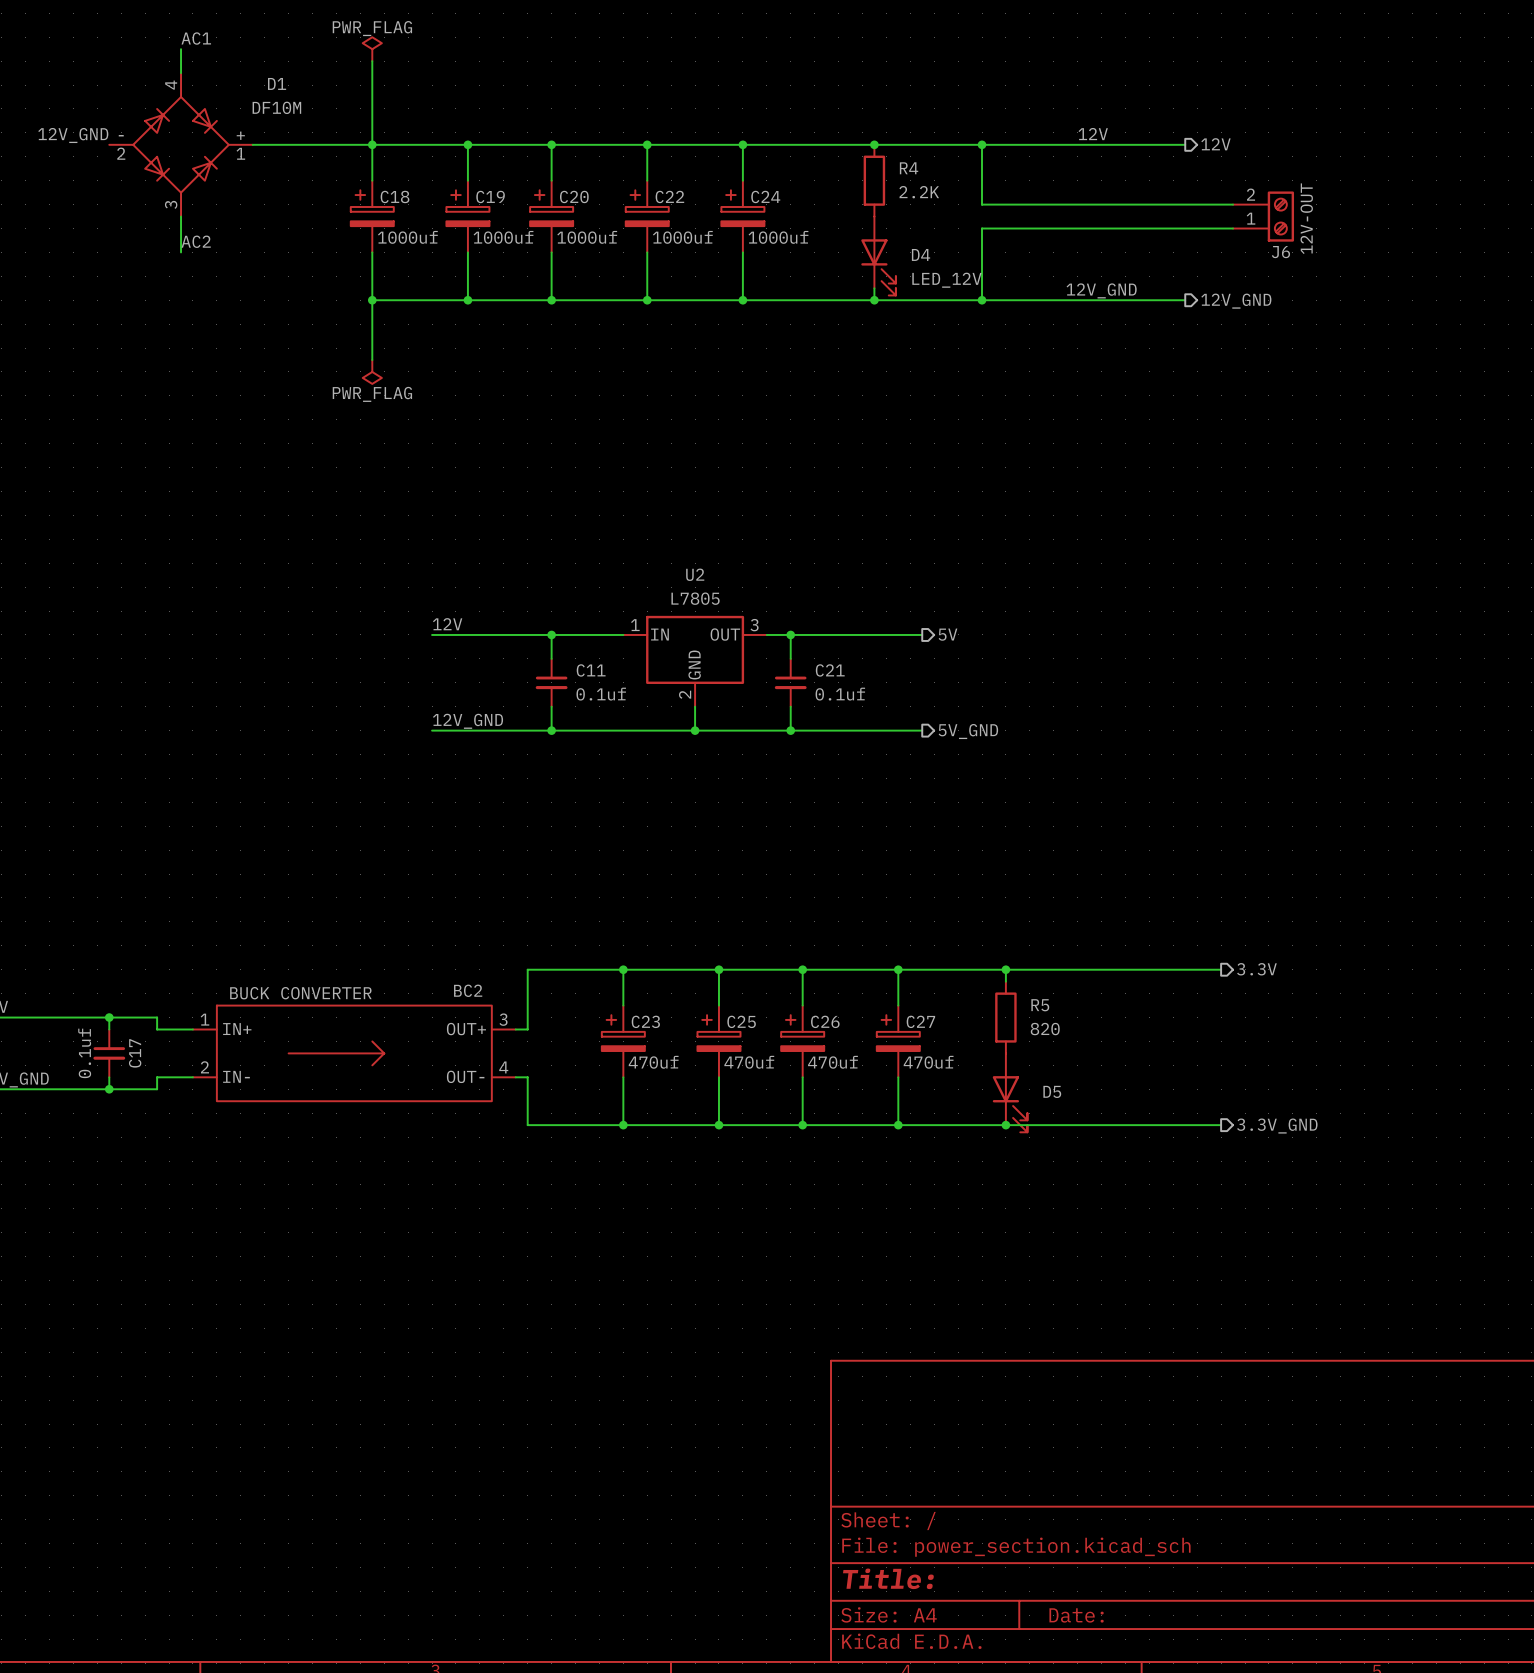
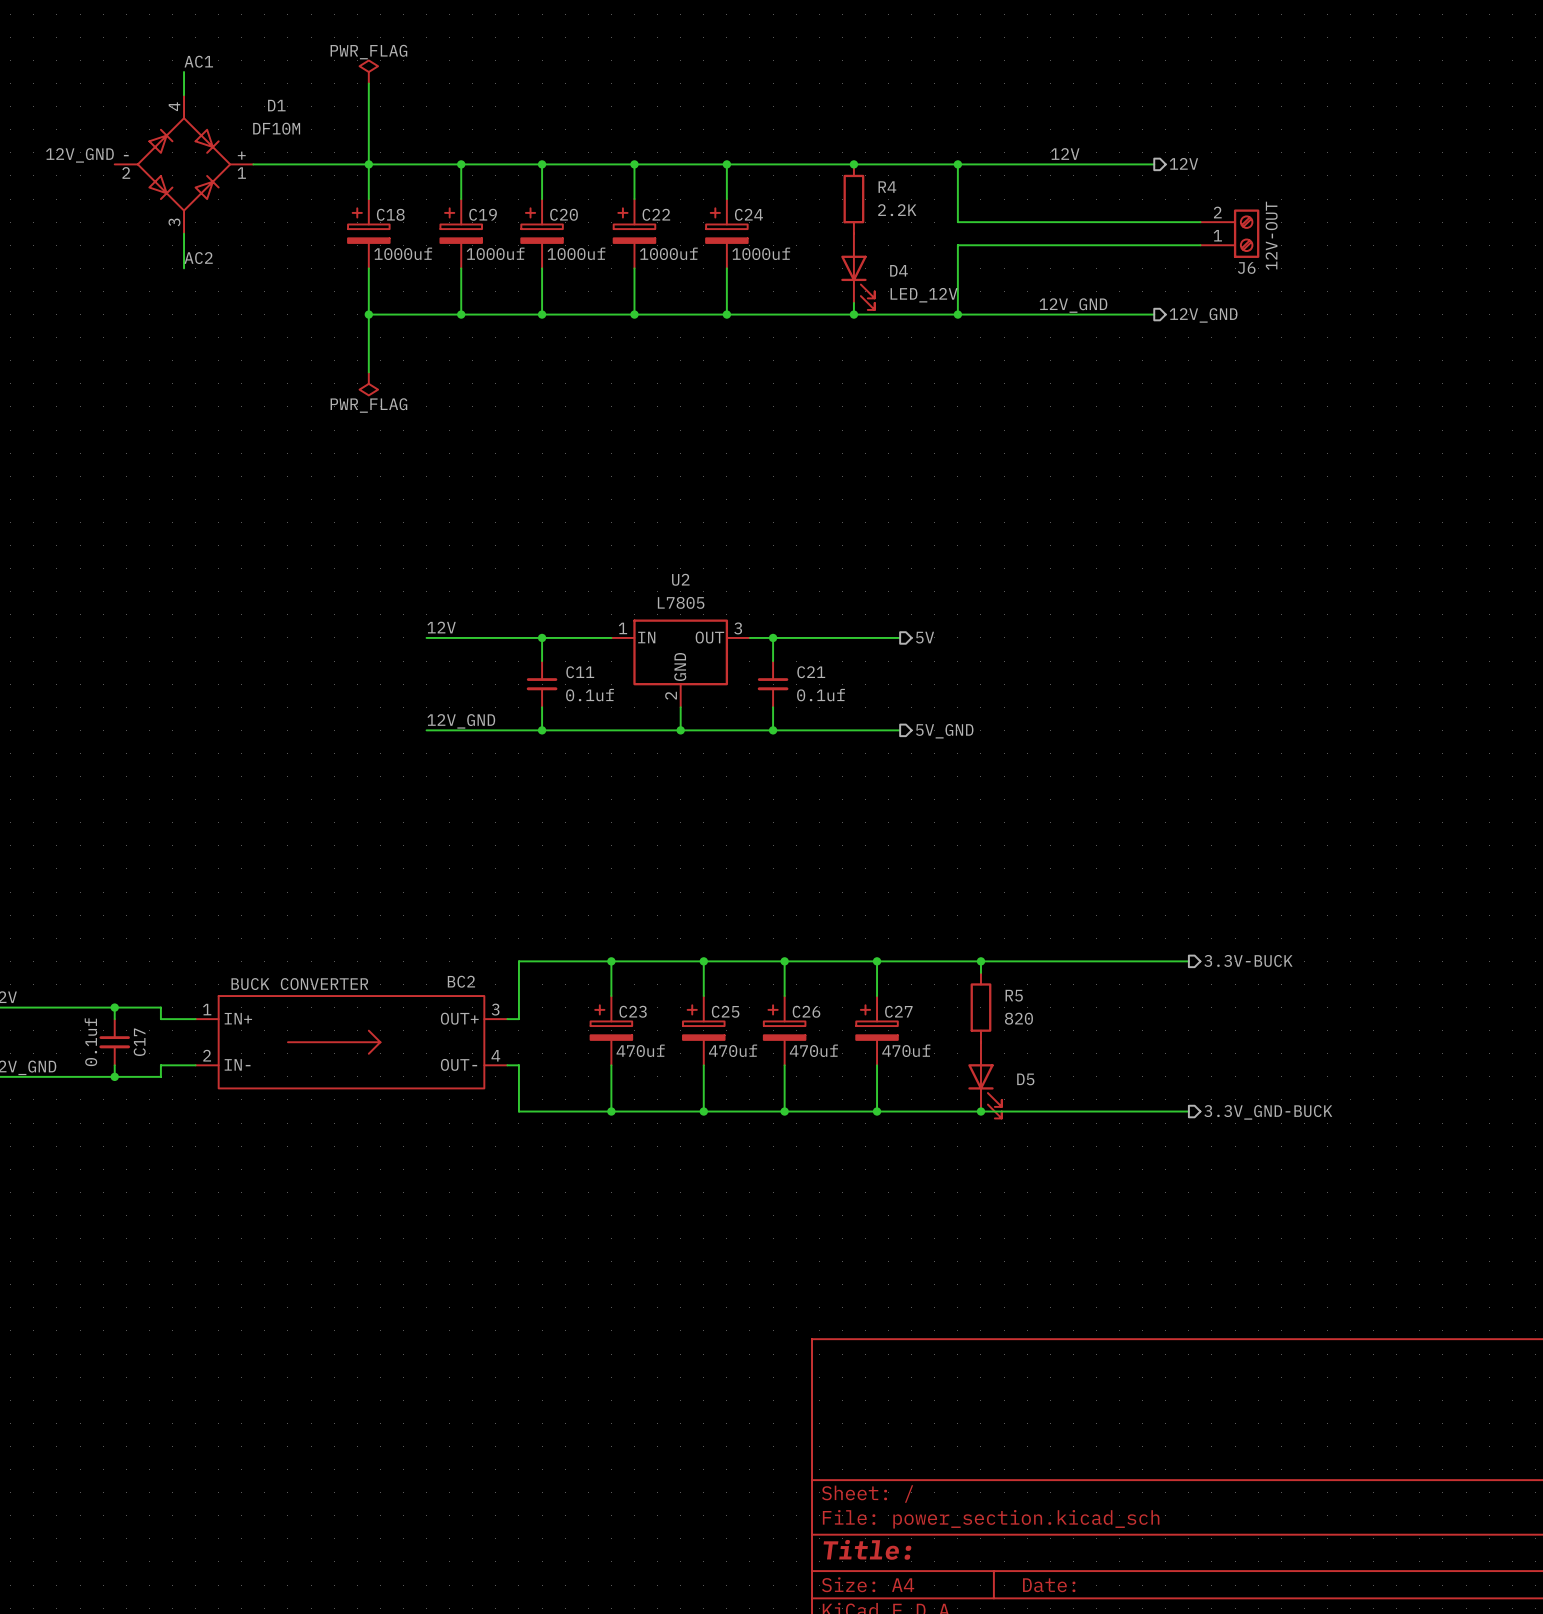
hierarchical label: 3.3V (1256, 969) -> 3.3V-BUCK (1248, 960)
hierarchical label: 3.3V_GND (1277, 1126) -> 3.3V_GND-BUCK (1268, 1112)

